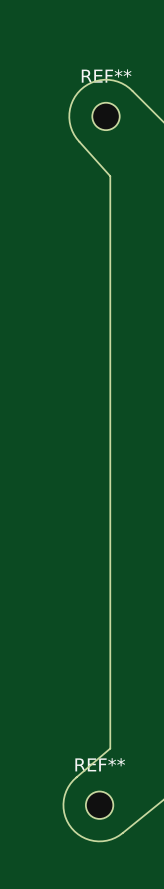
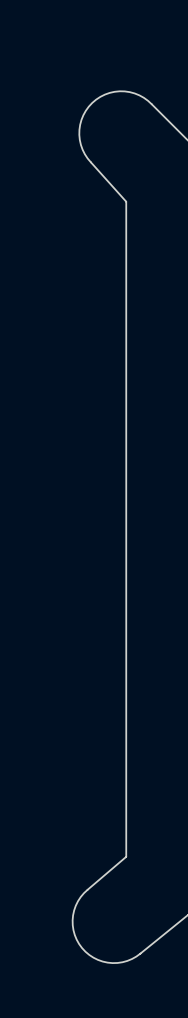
REF**: (106, 116) -> none
REF**: (99, 805) -> none

